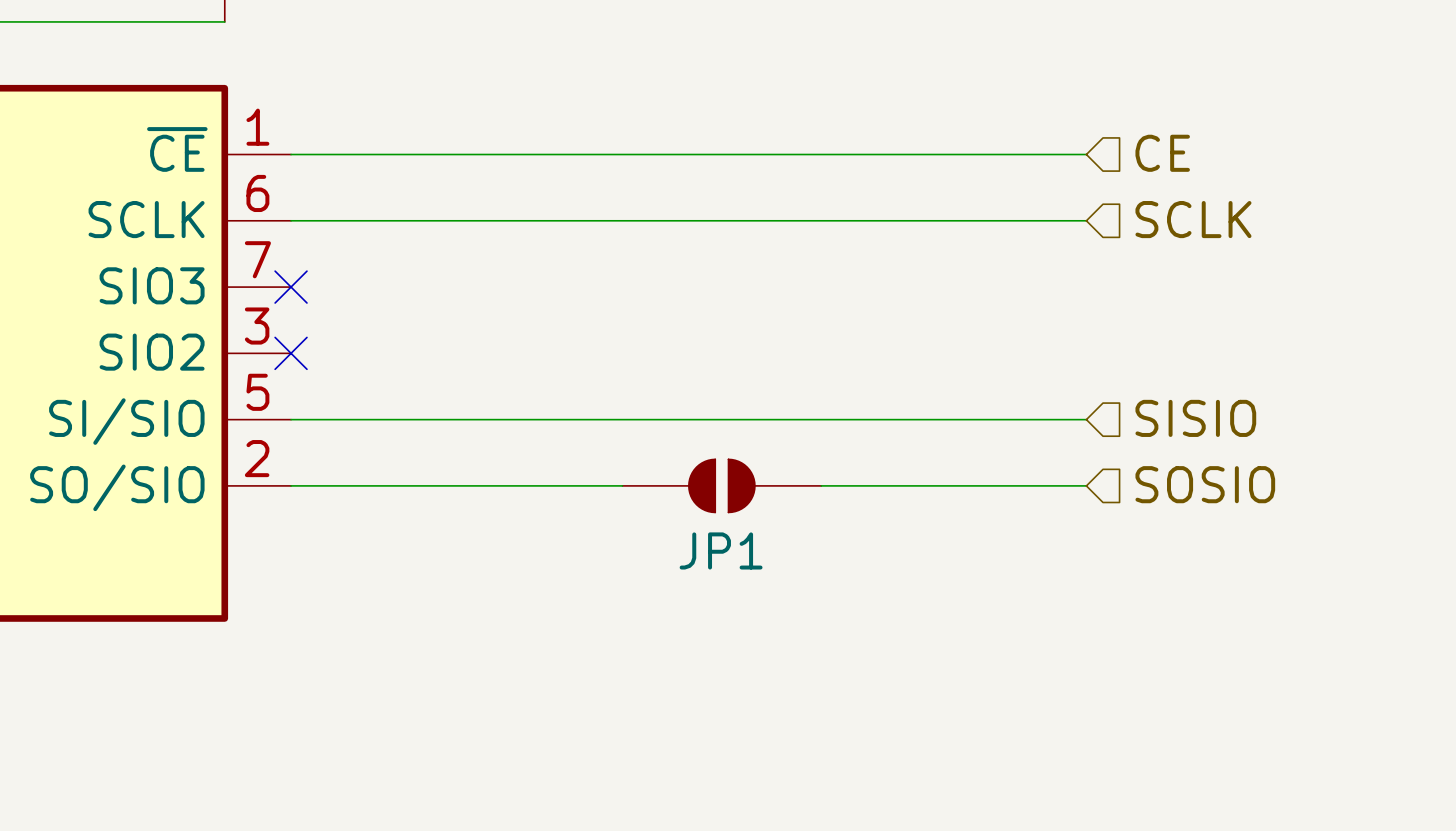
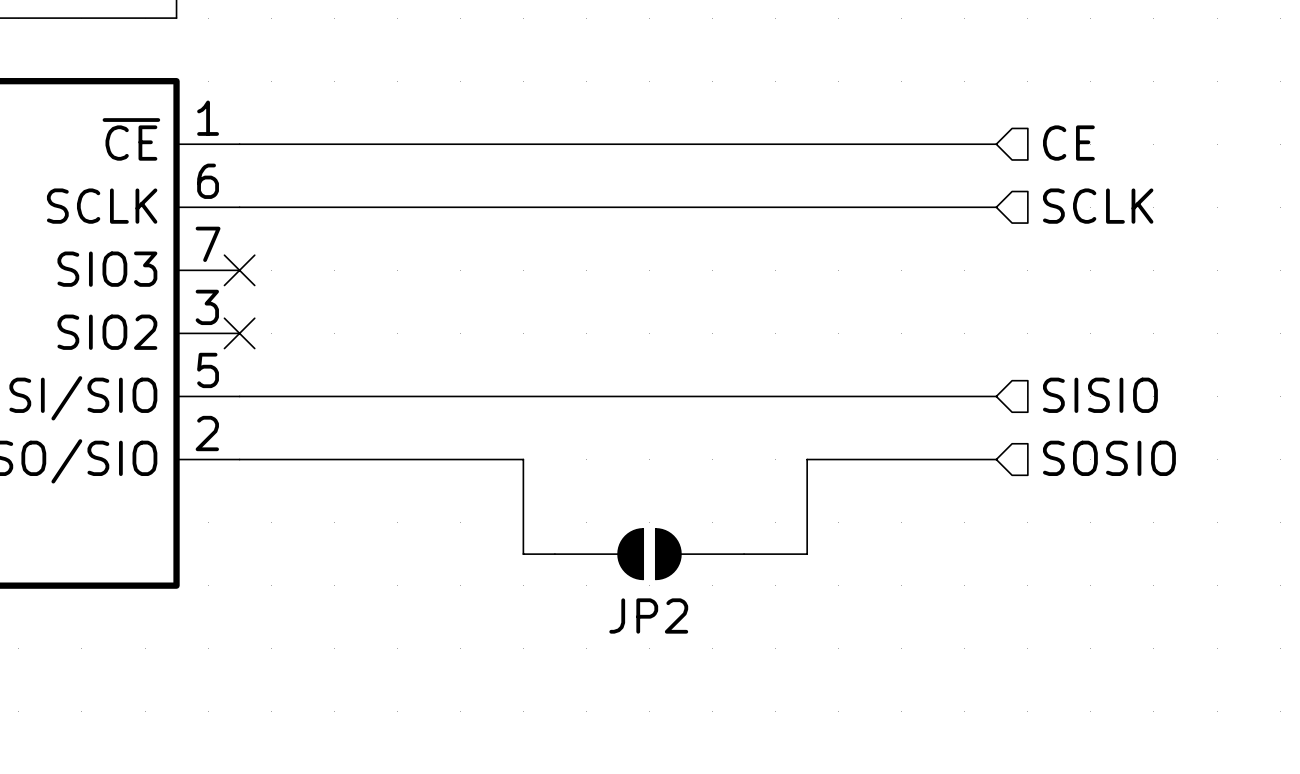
wire: (589, 485) (622, 485) -> (523, 459) (523, 554) (554, 554)
JP1: (721, 485) -> none
wire: (821, 485) (887, 485) -> (744, 554) (807, 554) (807, 459)
JP2: none -> (649, 554)

